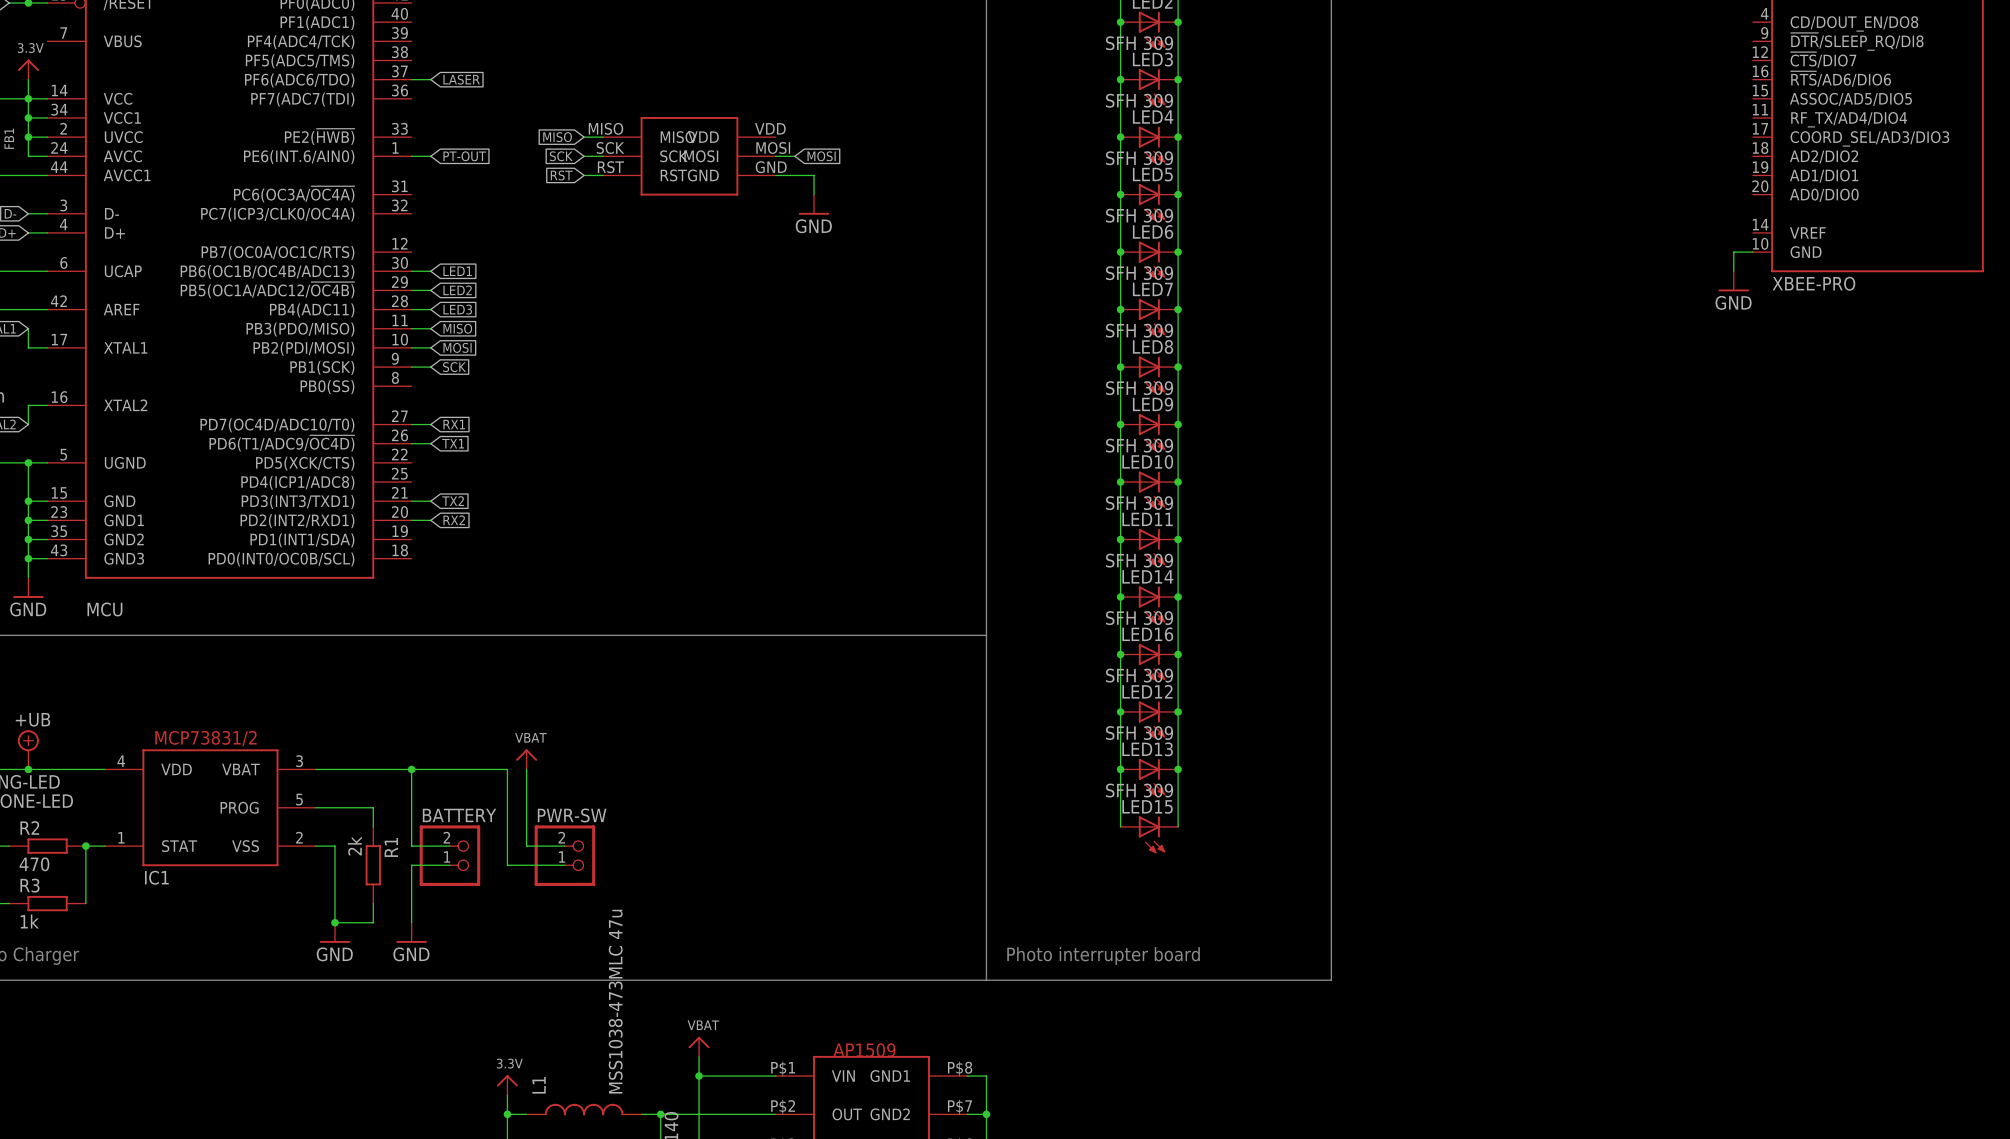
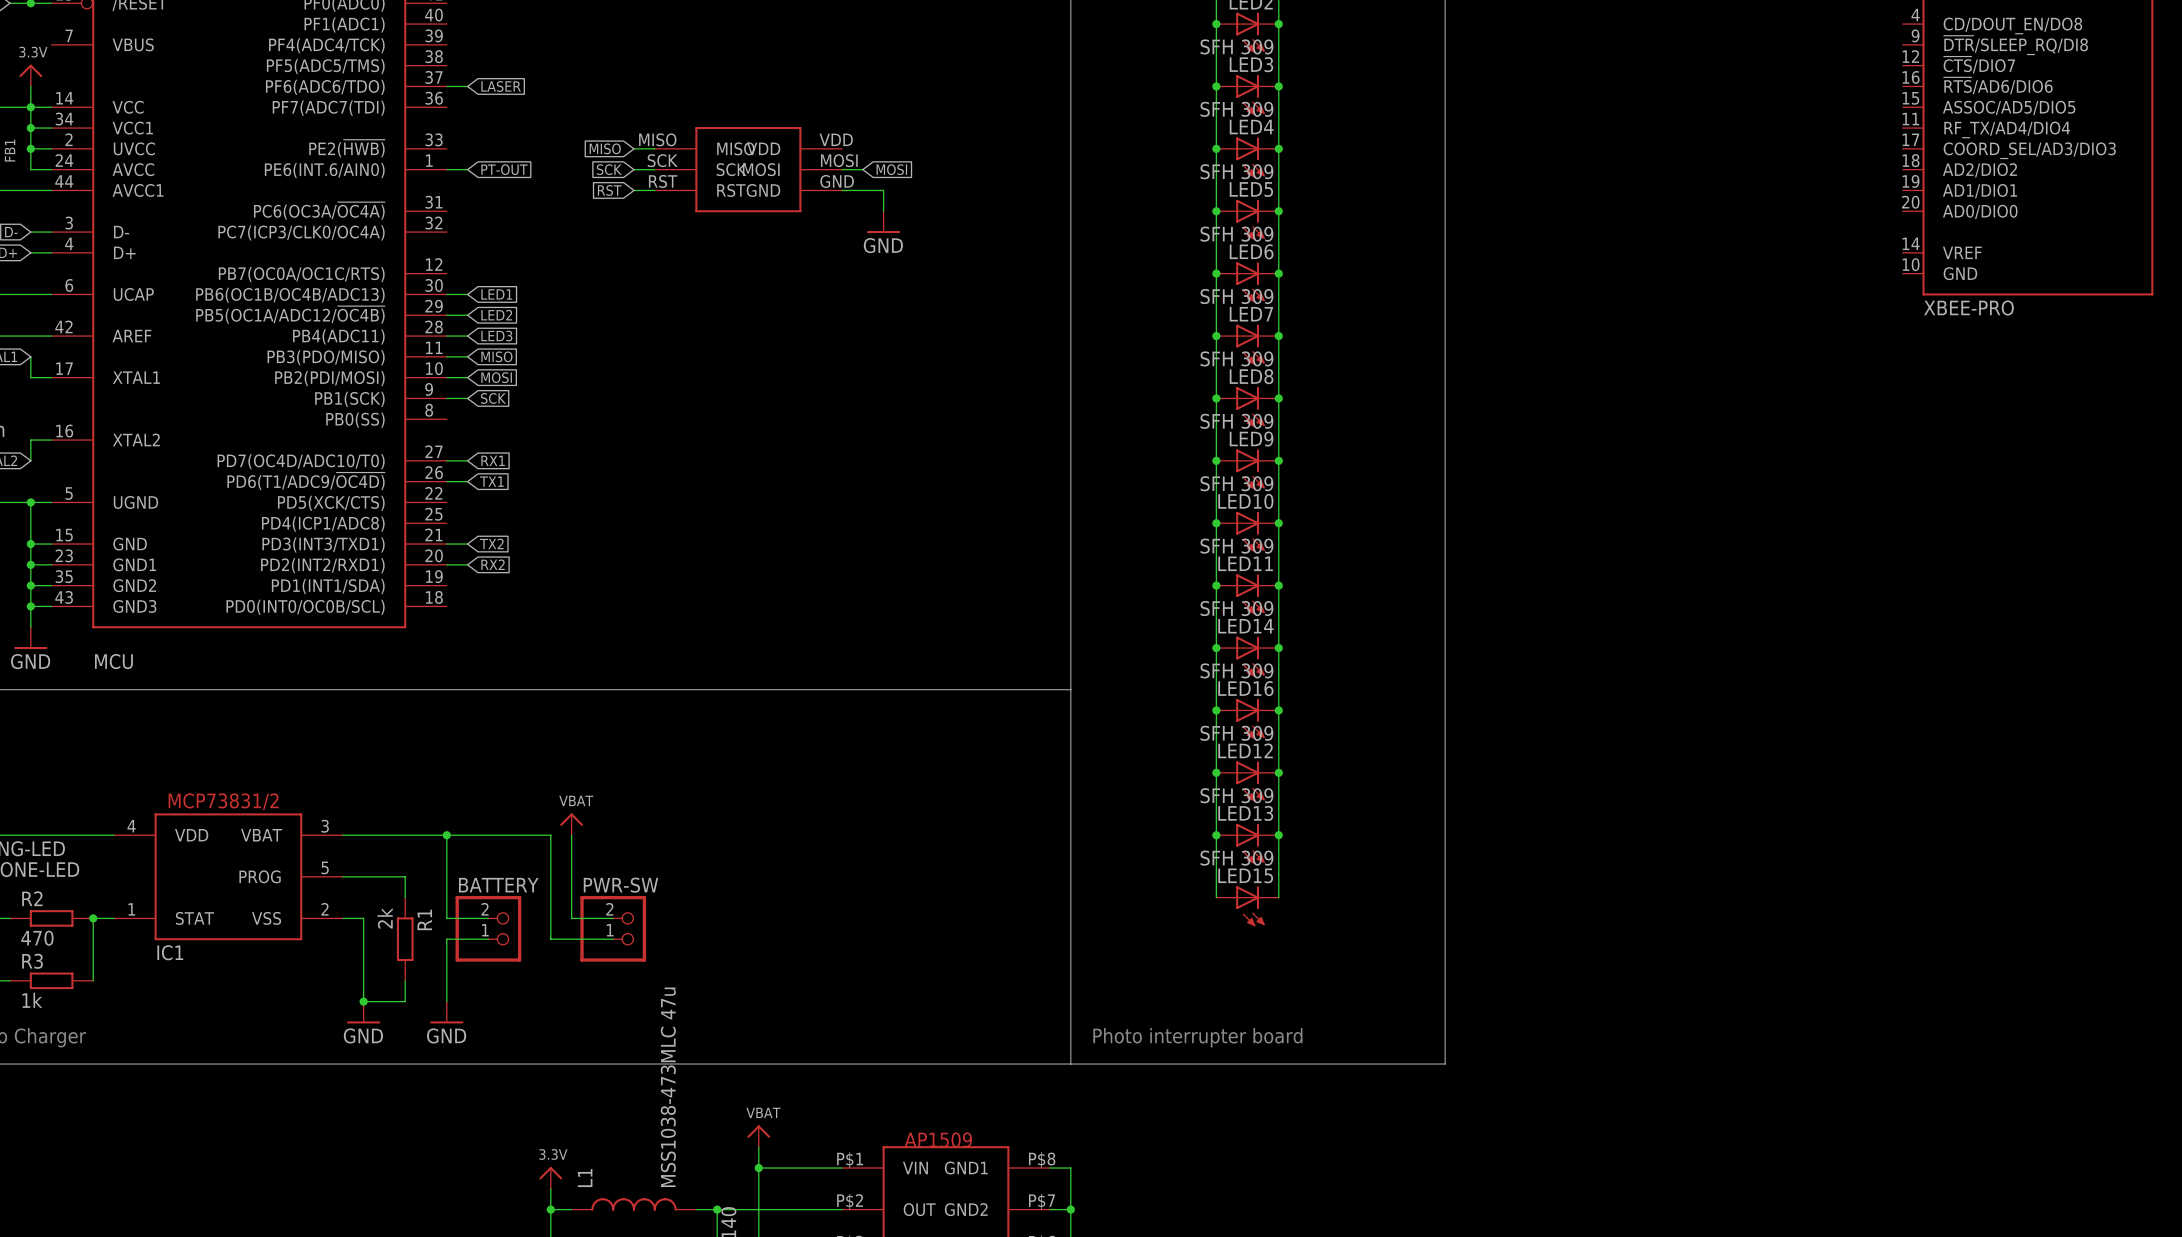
wire: (1752, 252) (1733, 252) (1733, 271) -> none
power symbol: GND (1733, 281) -> none
power symbol: +UB (28, 749) -> none
junction: (28, 769) -> none

